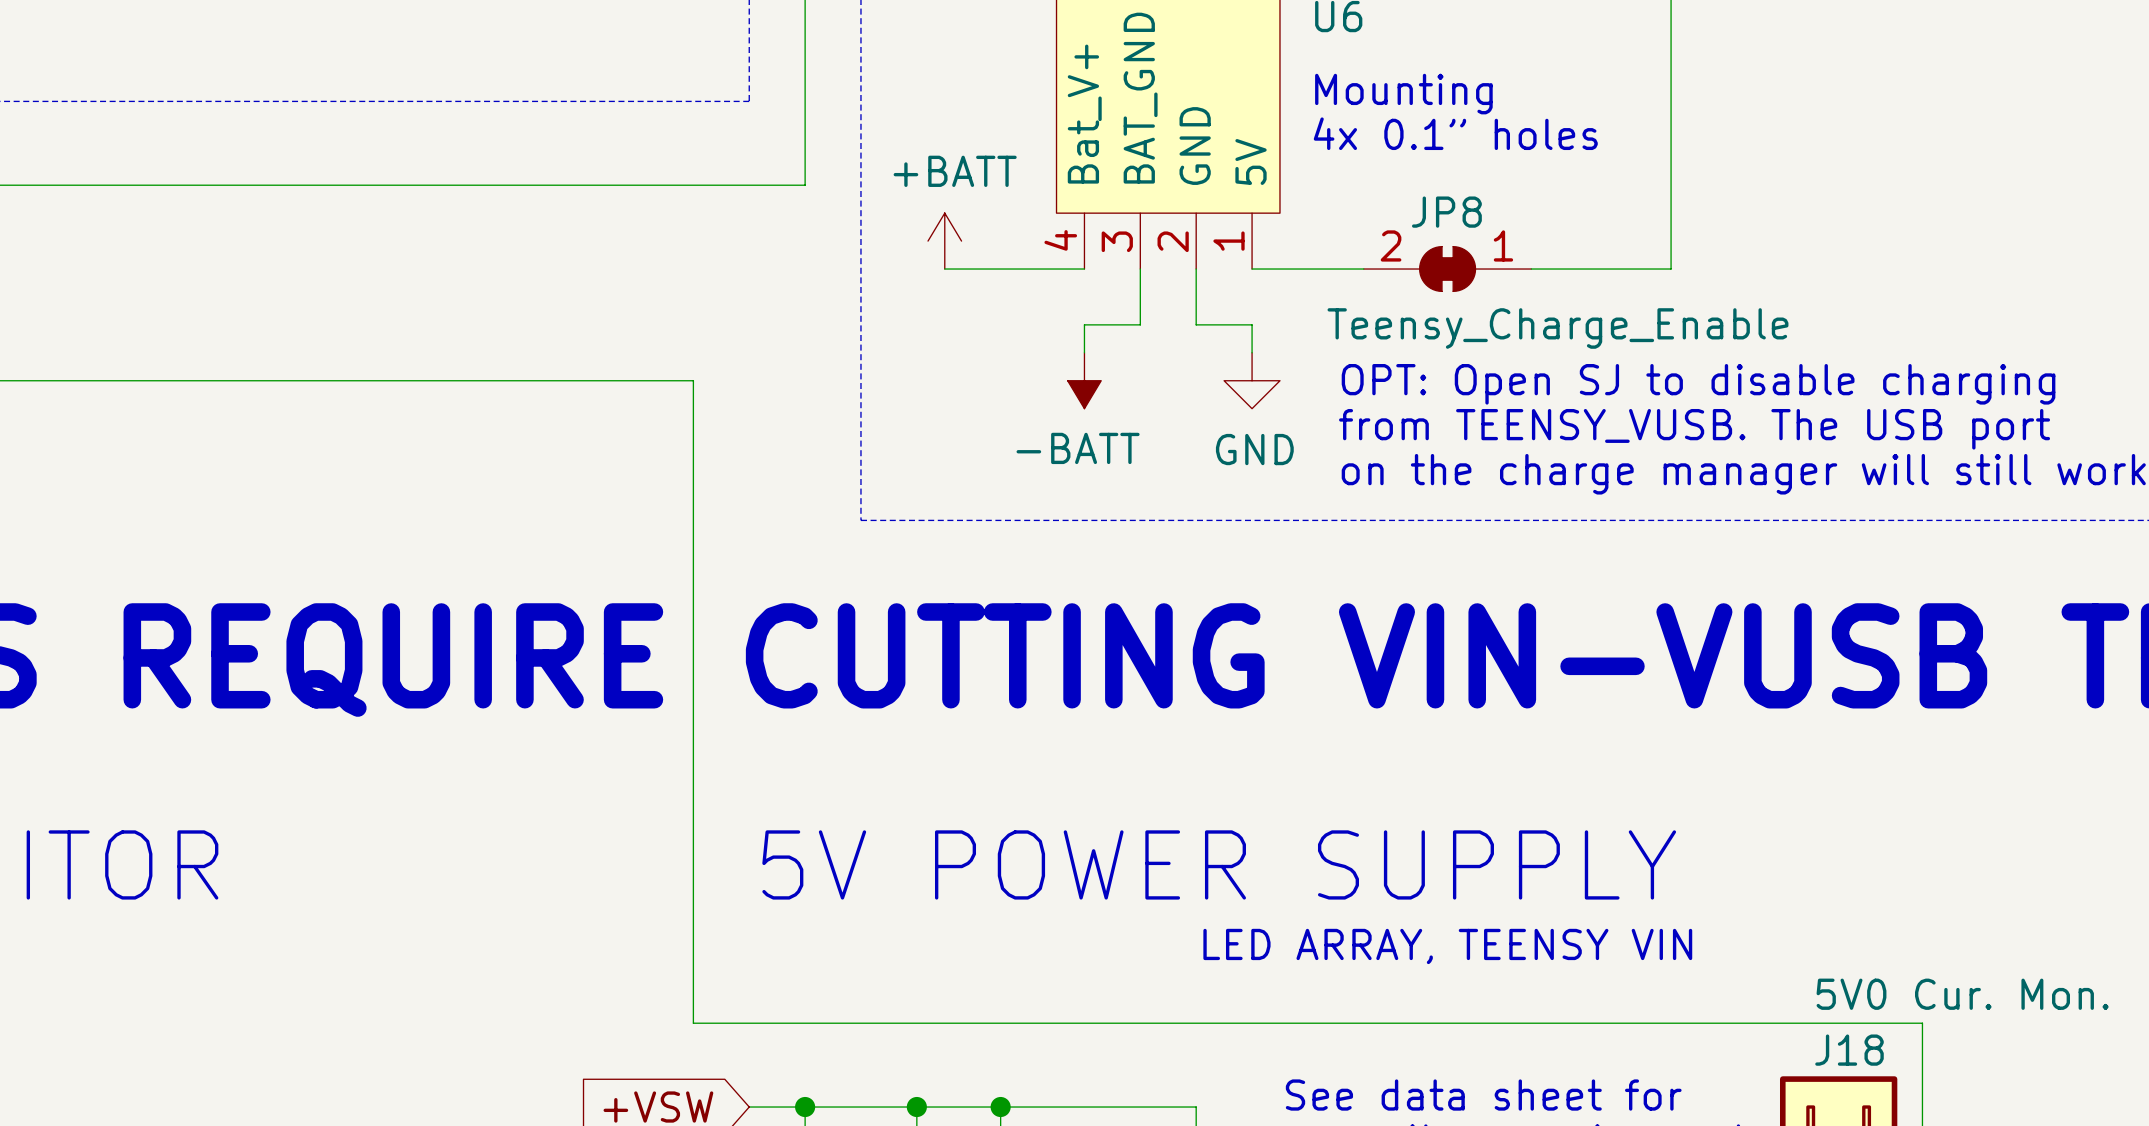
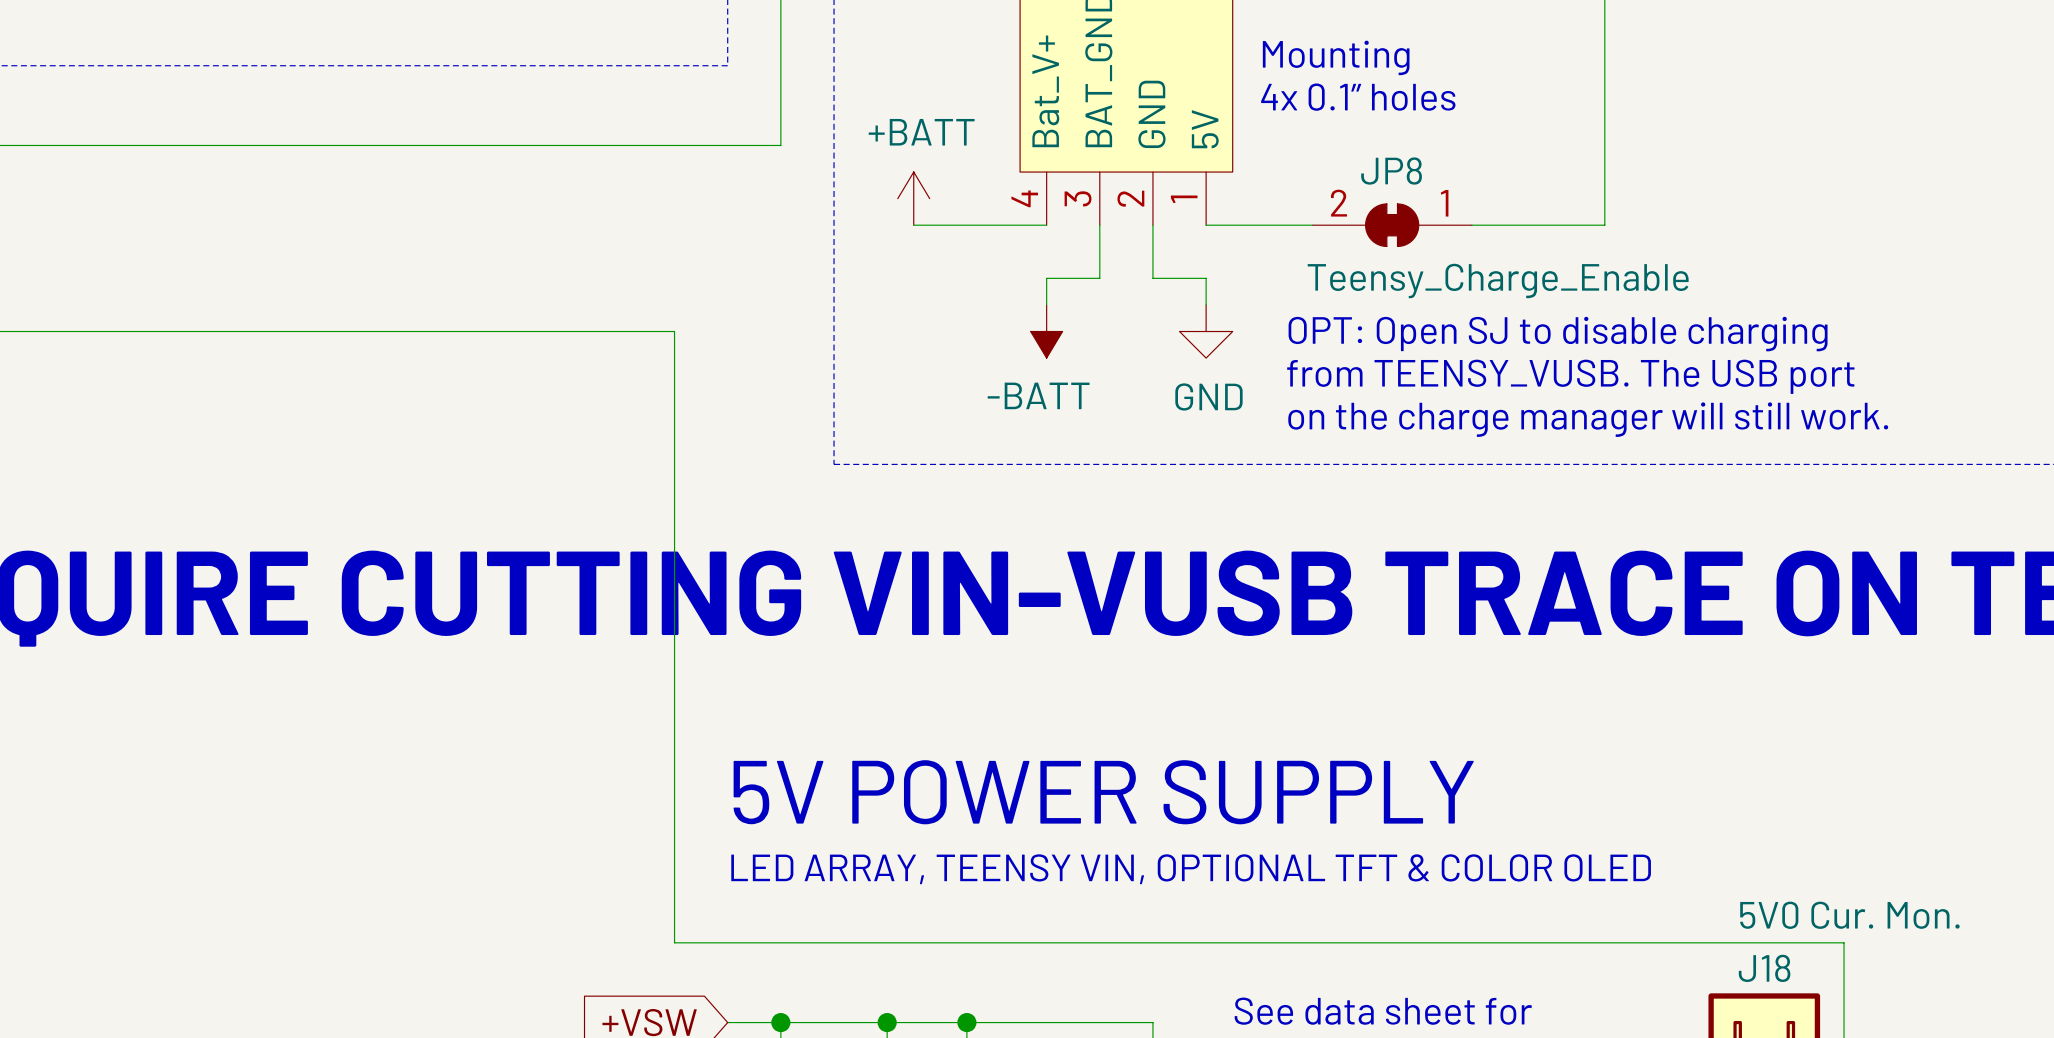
text: LED ARRAY, TEENSY VIN (1447, 946) -> LED ARRAY, TEENSY VIN, OPTIONAL TFT & COLOR OLED (1191, 869)

